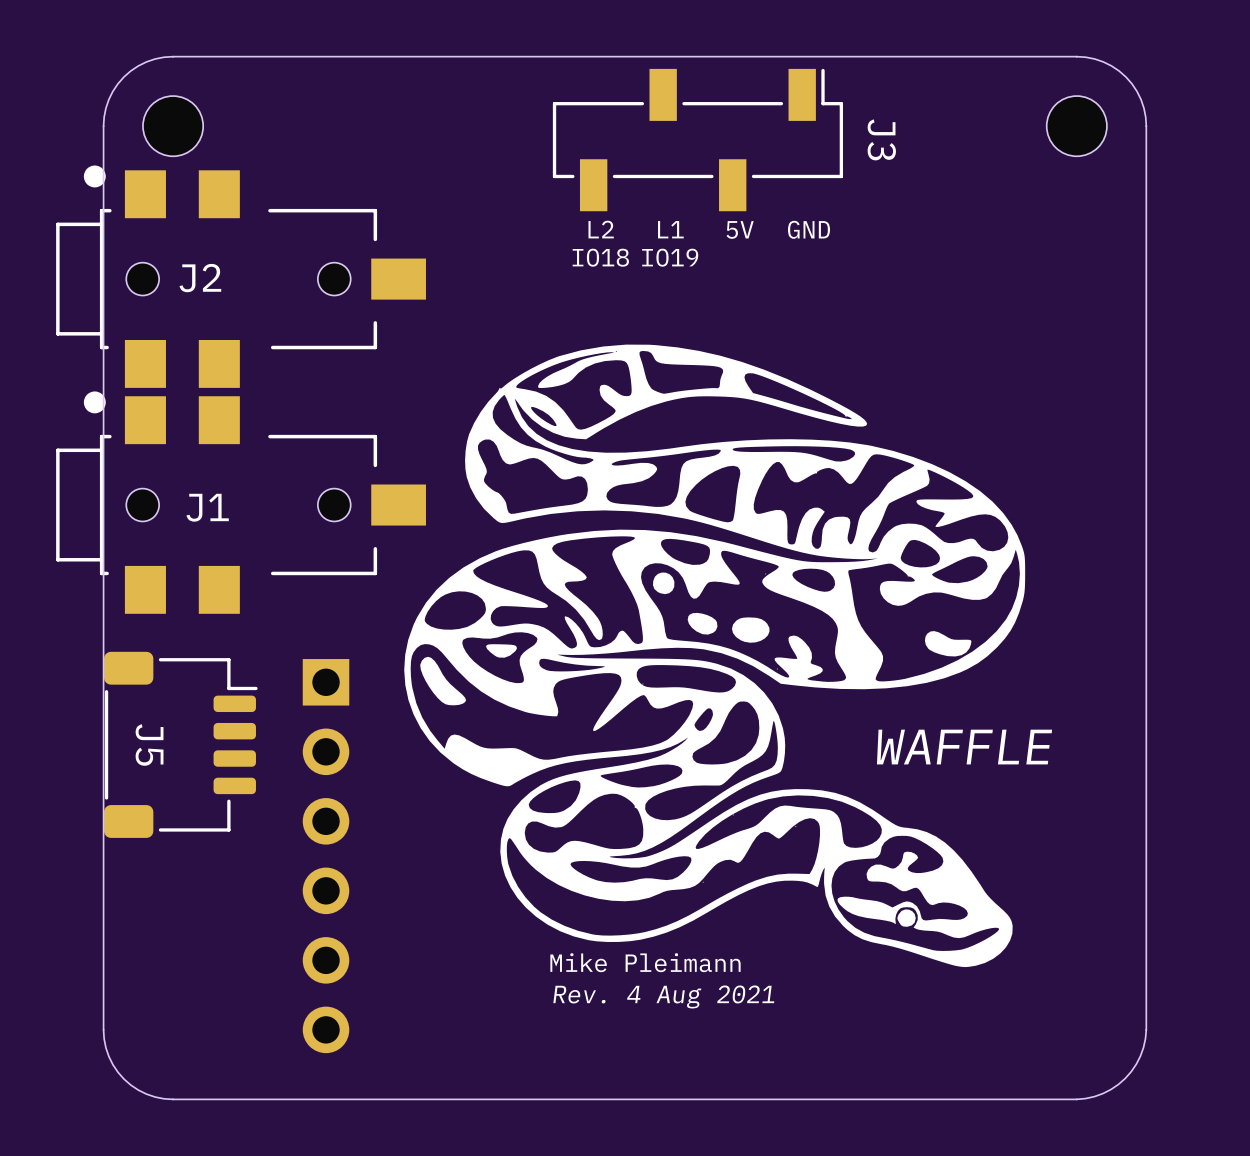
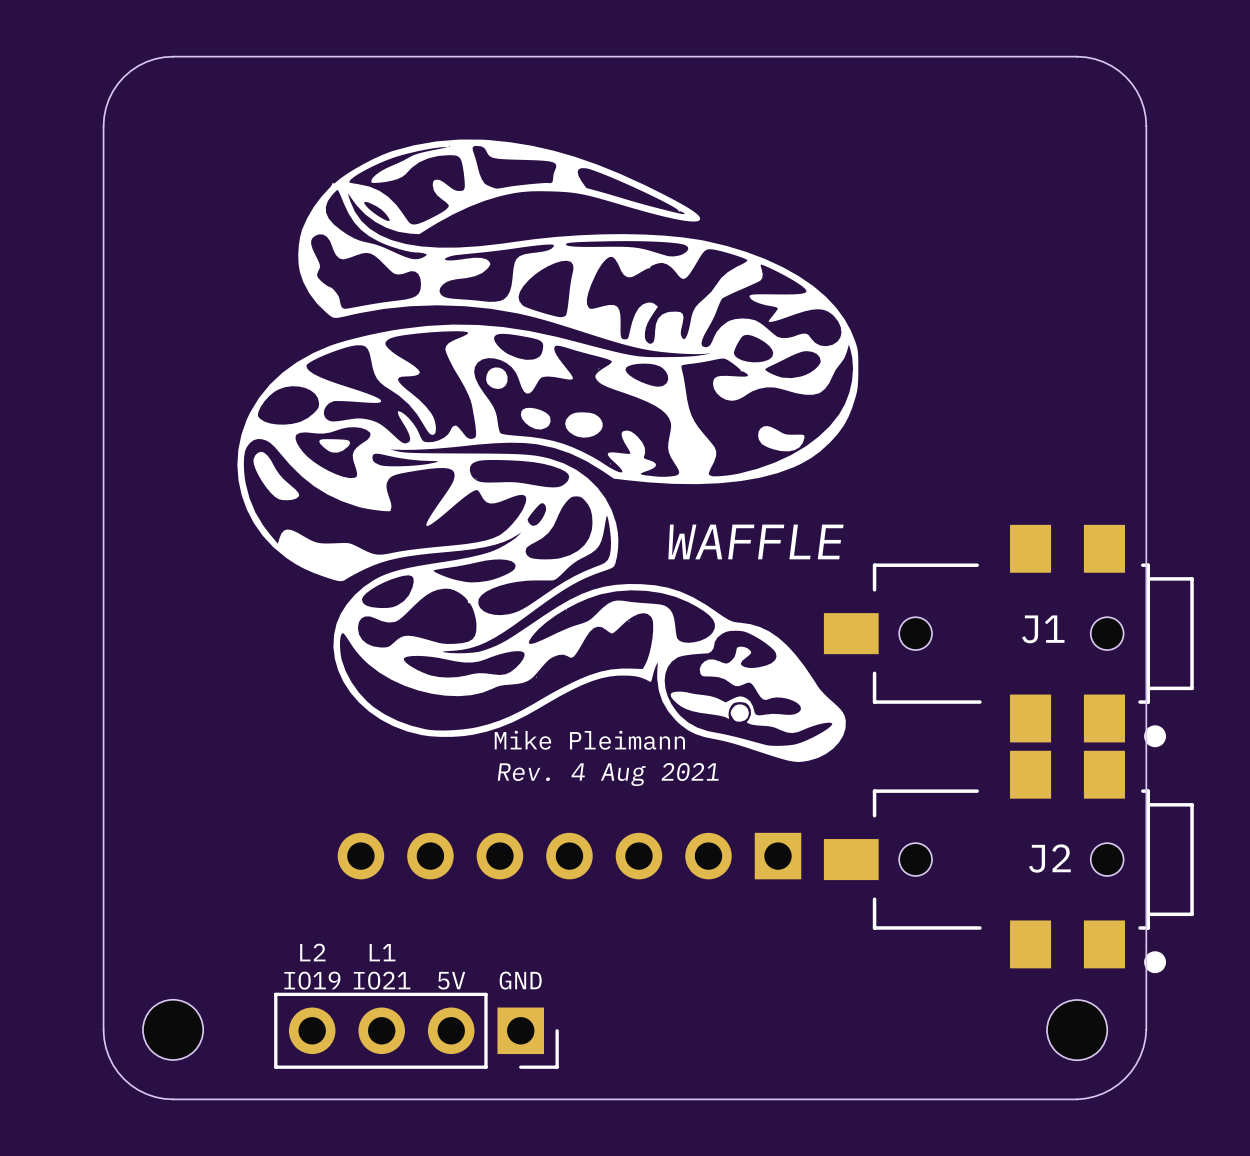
part: (173, 126) -> none
part: (1076, 126) -> none
J3: (697, 140) -> none
text: L2 (601, 229) -> none
text: L1 (670, 229) -> none
text: 5V (740, 229) -> none
text: GND (809, 229) -> none
text: IO18 (600, 257) -> none
text: IO19 (670, 257) -> none
J2 rotation: 0° (241, 276) -> 180° (1008, 861)
J2 position: (241, 276) -> (1008, 861)
J1 rotation: 0° (241, 502) -> 180° (1008, 636)
J1 position: (241, 502) -> (1008, 636)
WAFFLE position: (714, 655) -> (547, 450)
J5: (180, 744) -> none
WAFFLE name position: WAFFLE (964, 747) -> WAFFLE (755, 541)
part: (326, 856) -> none
part: none -> (569, 856)
text: none -> L2 (312, 952)
text: none -> L1 (382, 952)
text position: Mike Pleimann (645, 962) -> Mike Pleimann (589, 740)
text: none -> IO19 (312, 980)
text: none -> IO21 (382, 980)
text: none -> 5V (451, 980)
text: none -> GND (520, 980)
text position: Rev. 4 Aug 2021 (663, 996) -> Rev. 4 Aug 2021 (608, 774)
part: none -> (173, 1029)
part: none -> (416, 1030)
part: none -> (1077, 1030)

